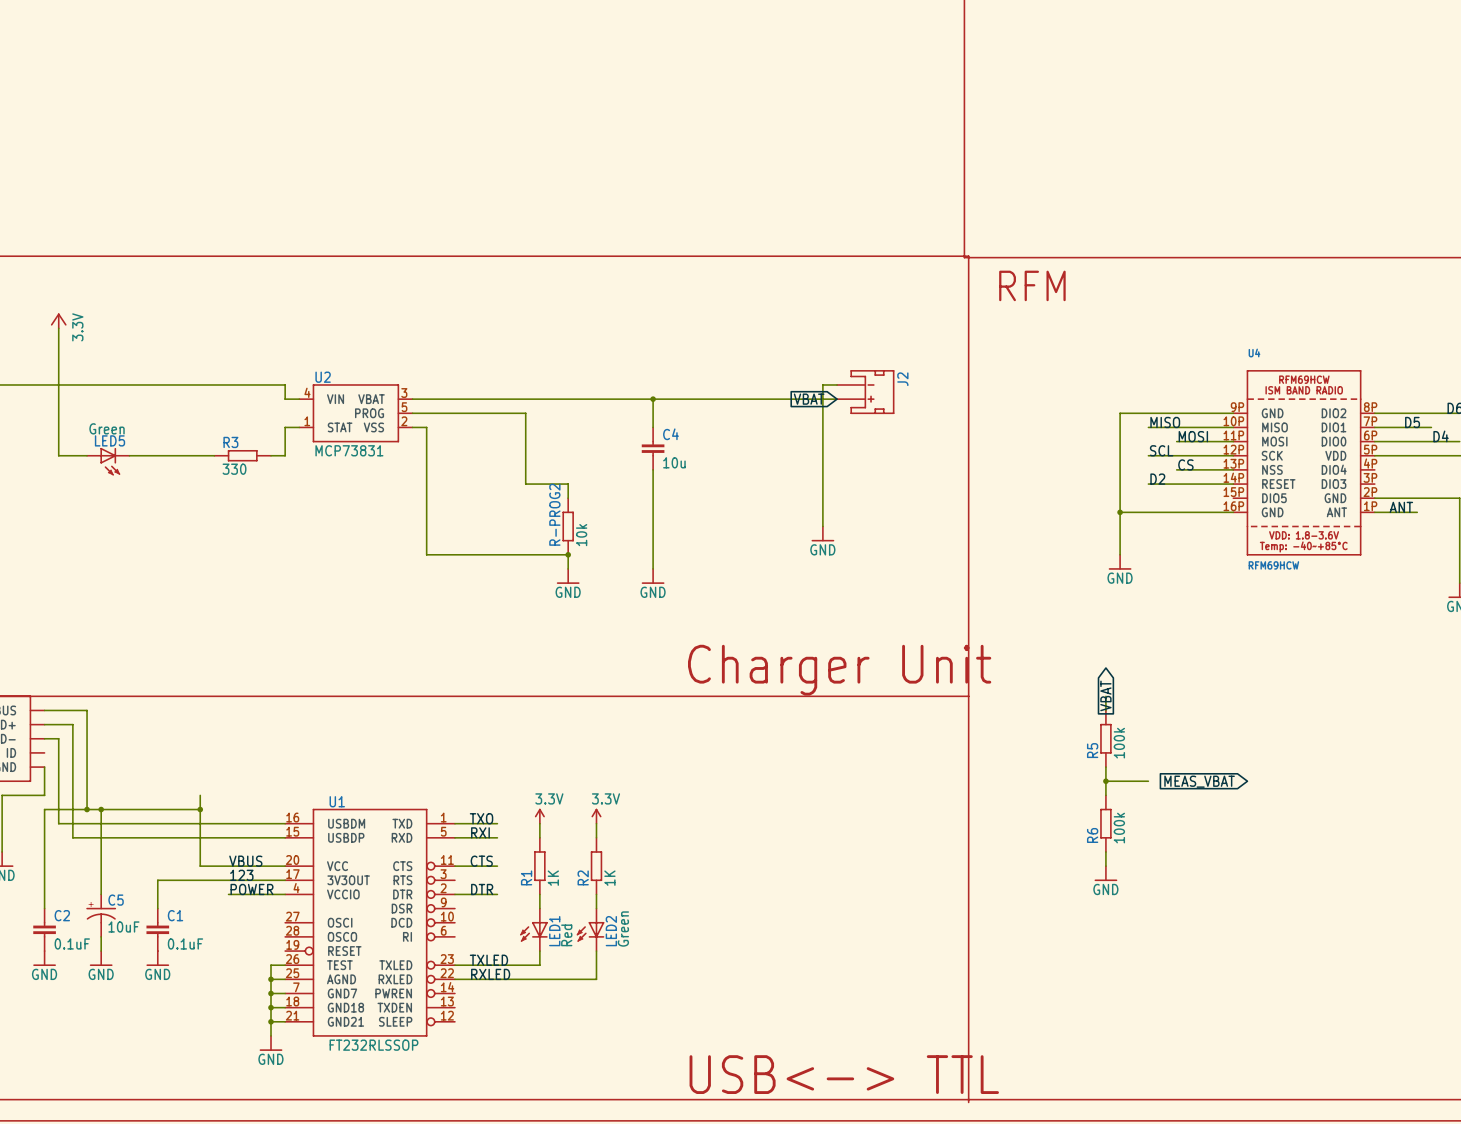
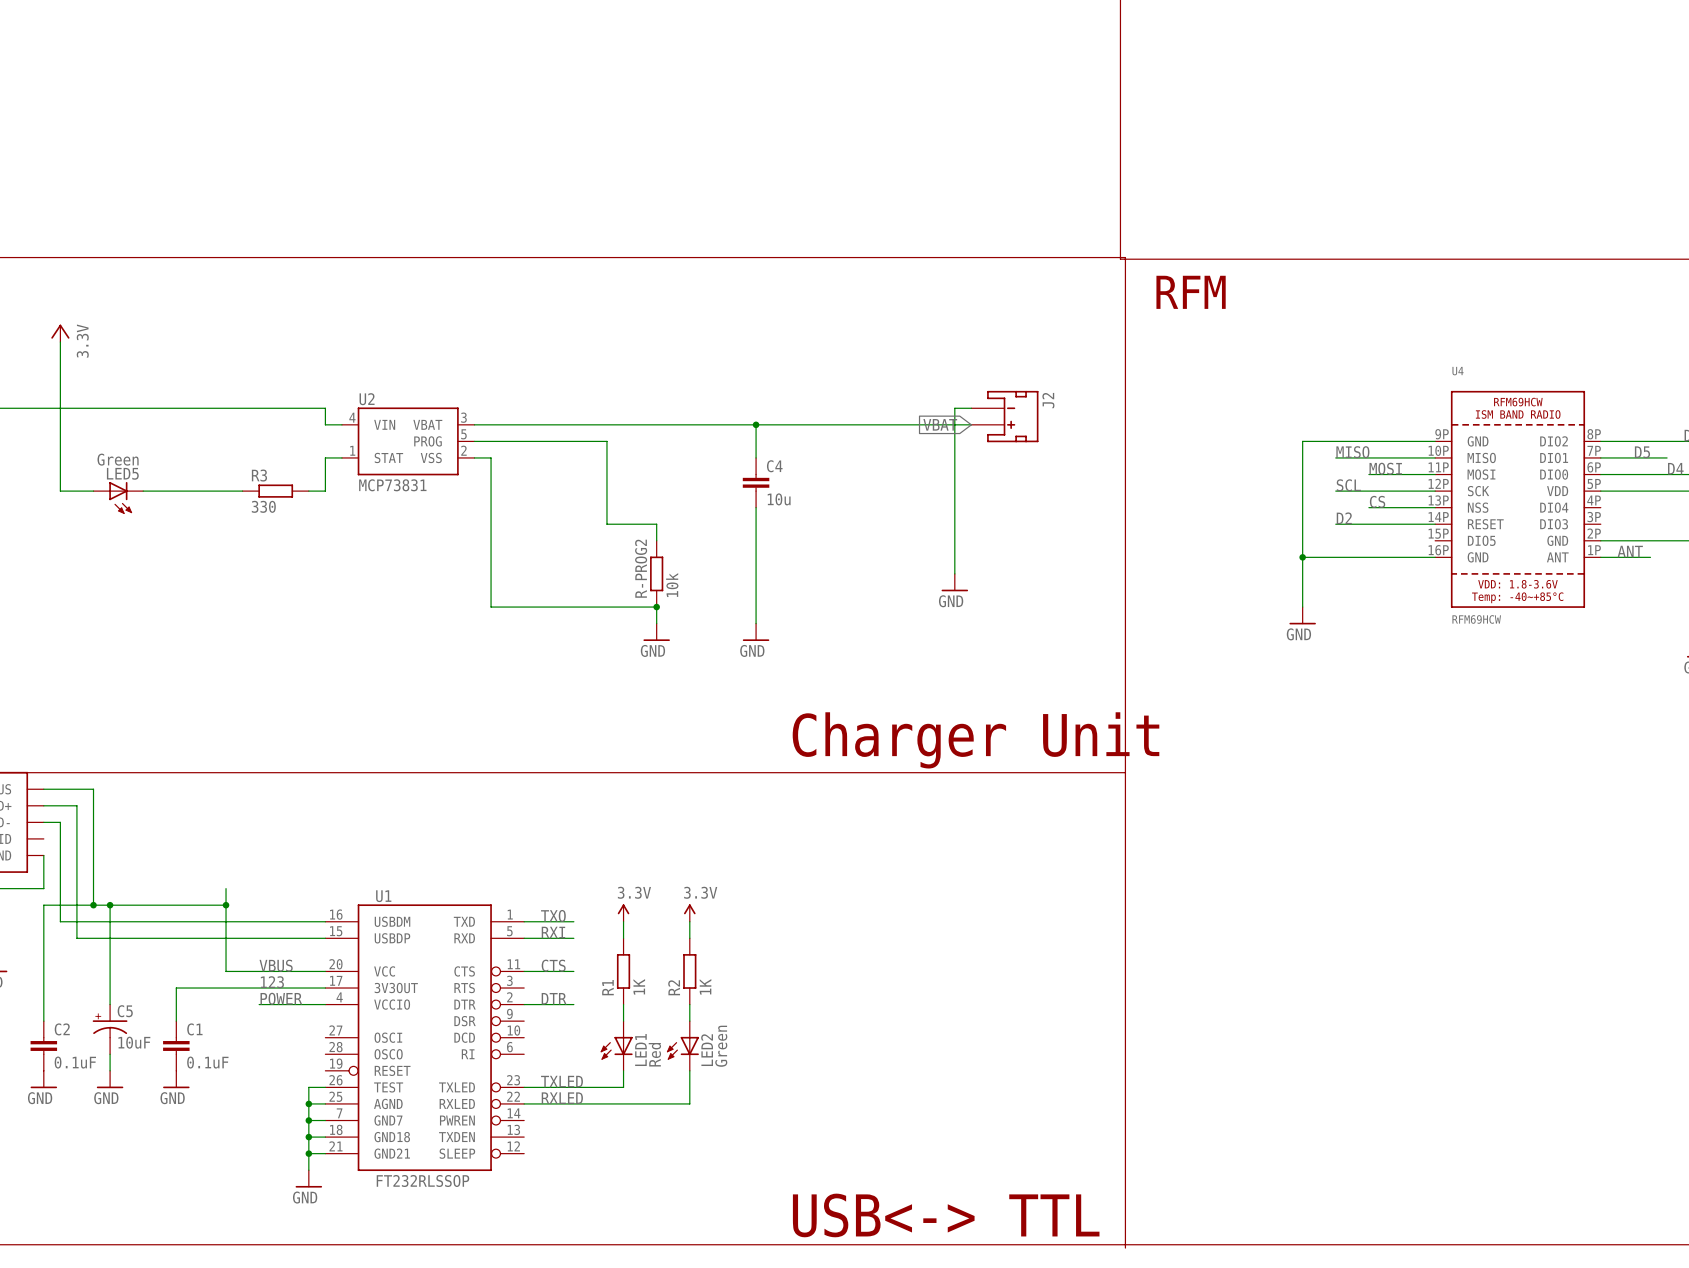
global label: VBAT (1105, 695) -> none
wire: (1105, 696) (1105, 710) -> none
R5: 100k (1105, 738) -> none
wire: (1105, 767) (1105, 795) -> none
wire: (1105, 781) (1148, 781) -> none
junction: (1105, 781) -> none
global label: MEAS_VBAT (1199, 781) -> none
R6: 100k (1105, 823) -> none
wire: (1105, 851) (1105, 866) -> none
power symbol: GND (1105, 873) -> none

